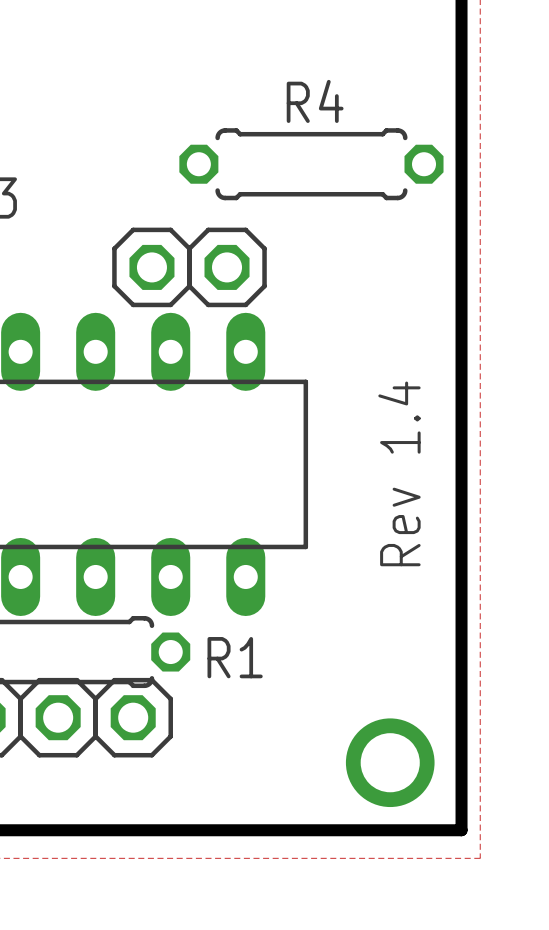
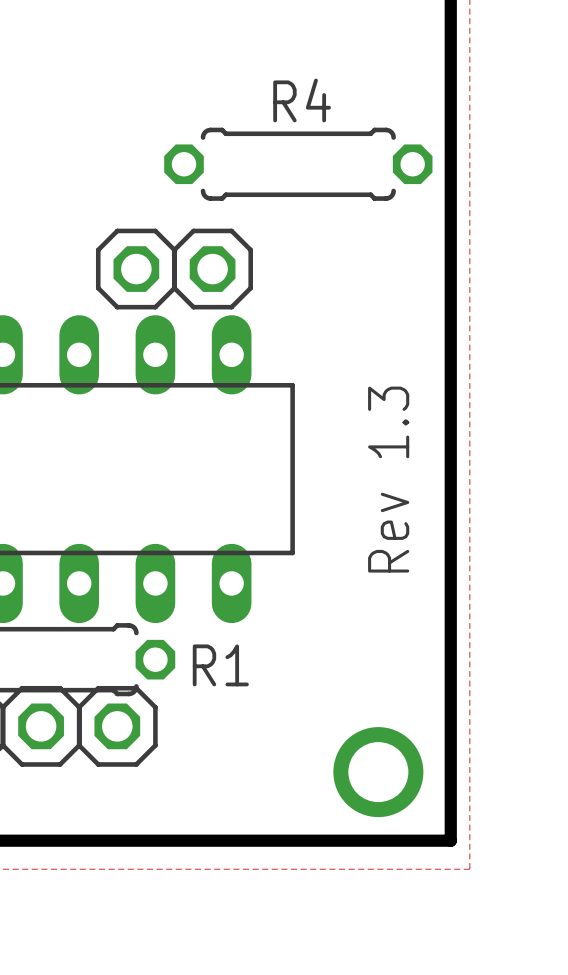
text: Rev 1.4 (399, 473) -> Rev 1.3 (388, 479)

